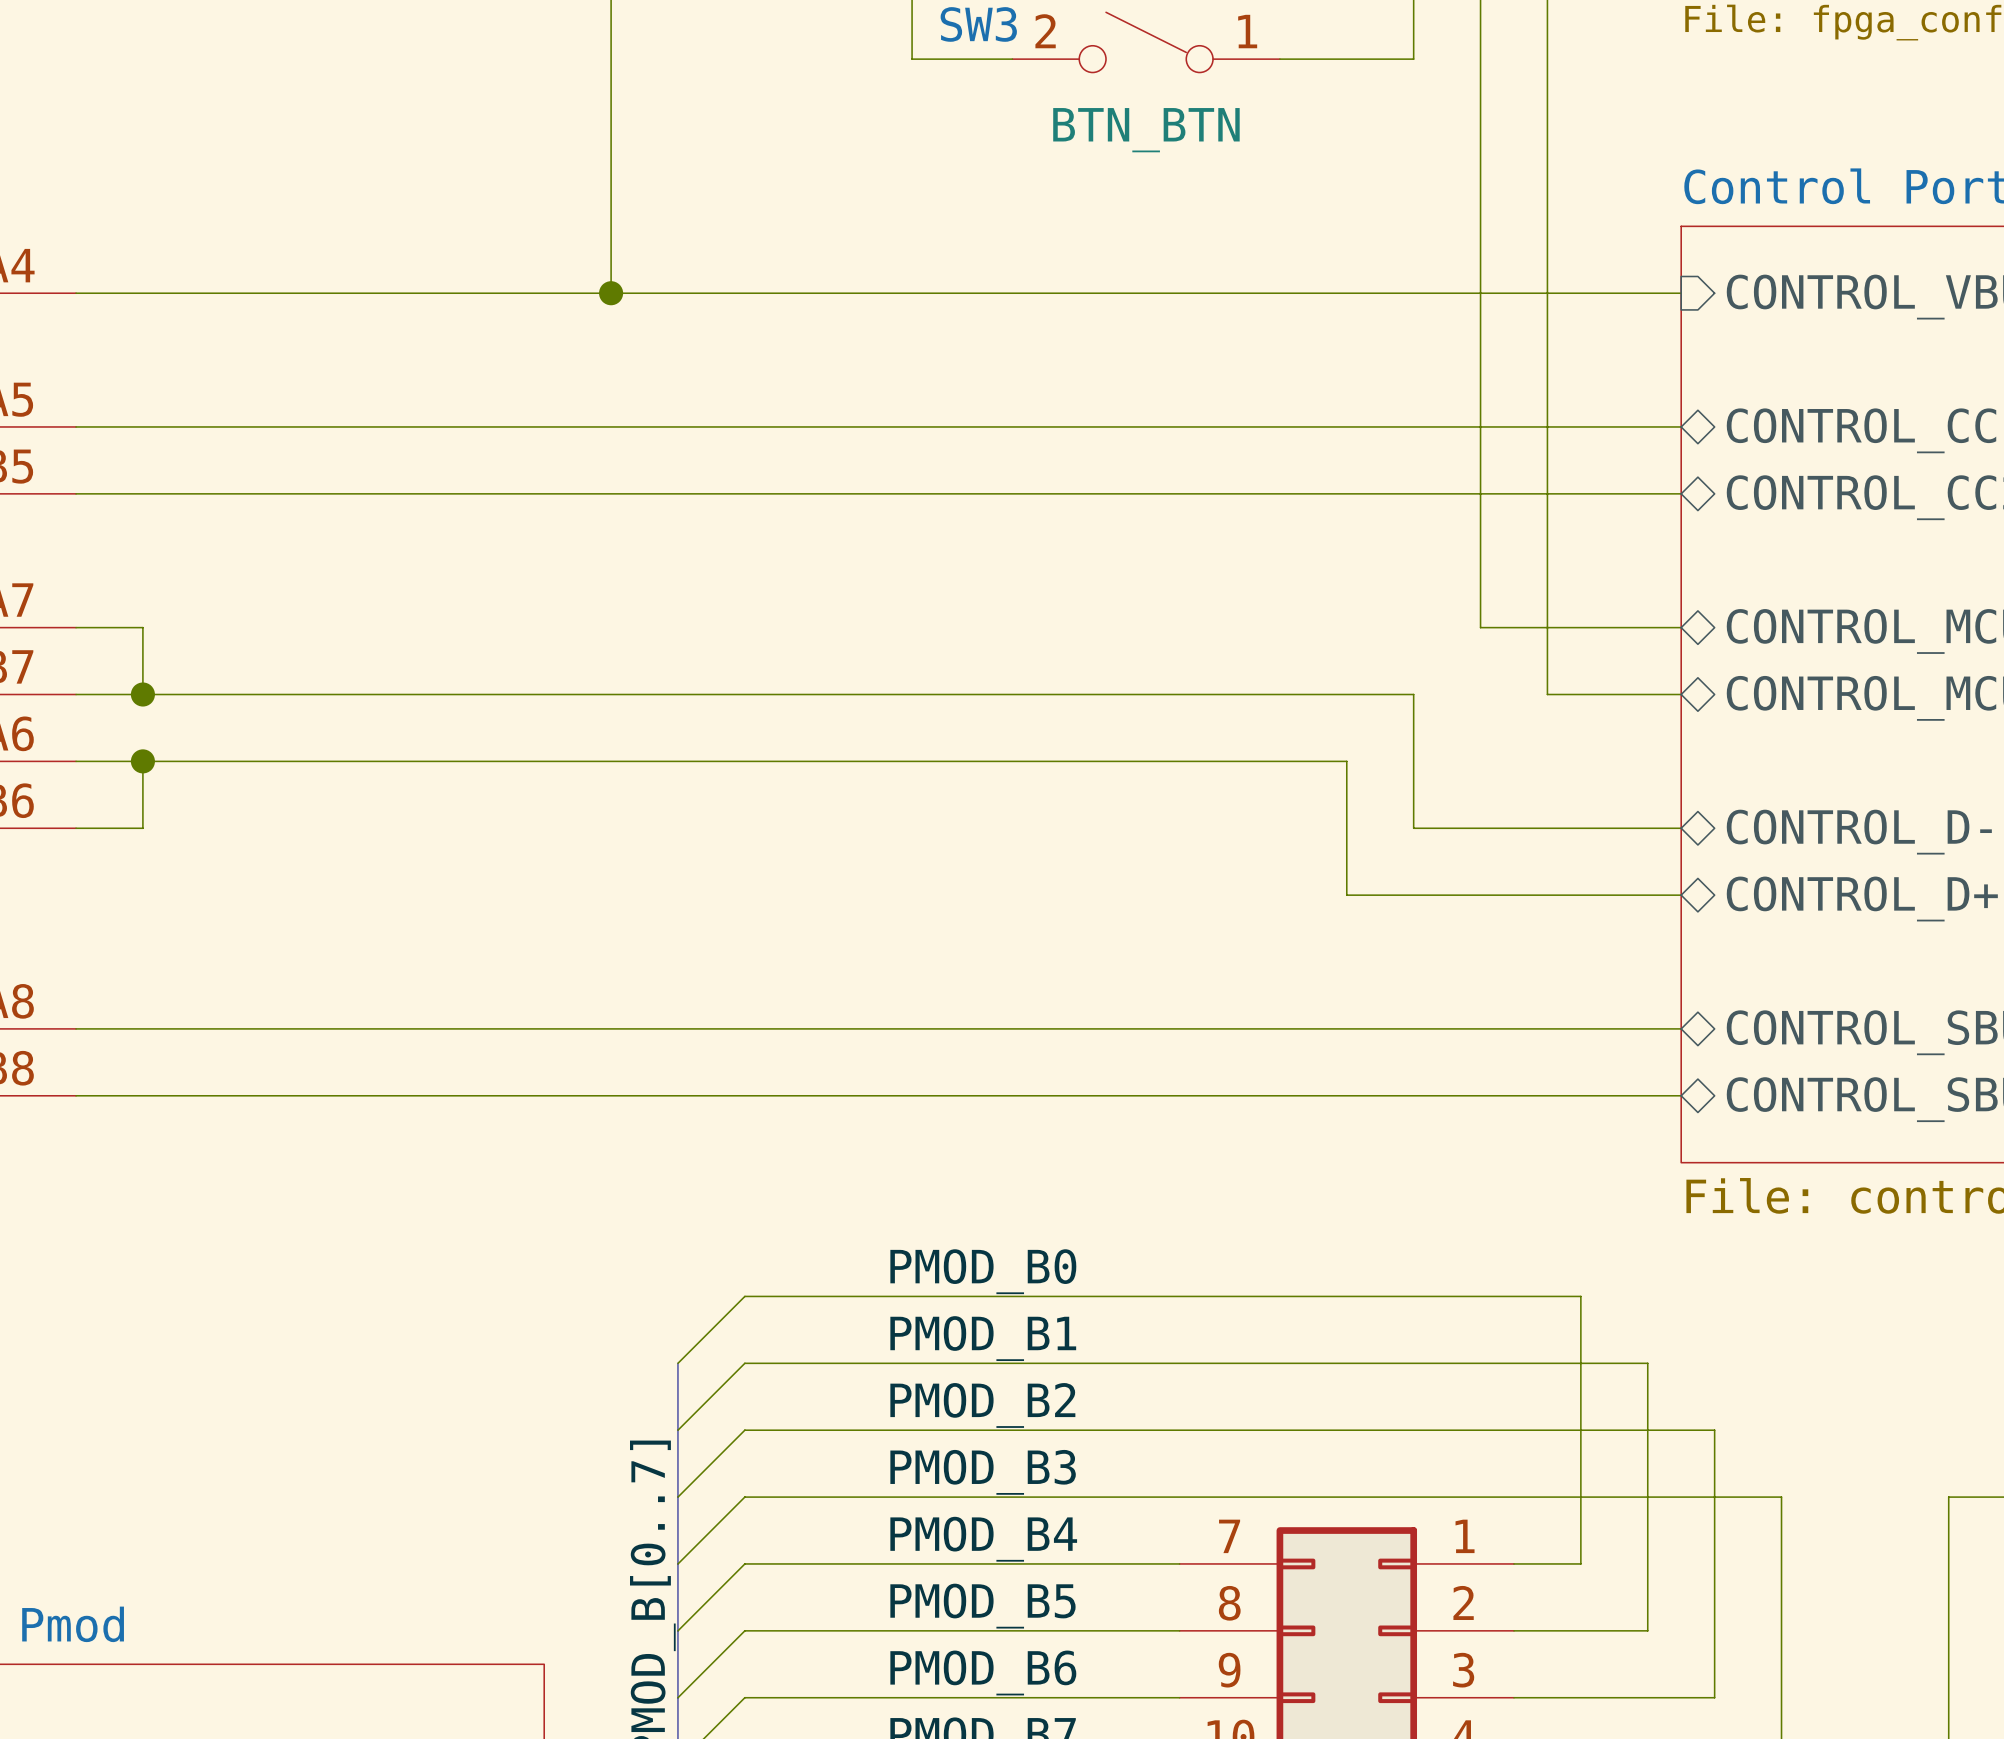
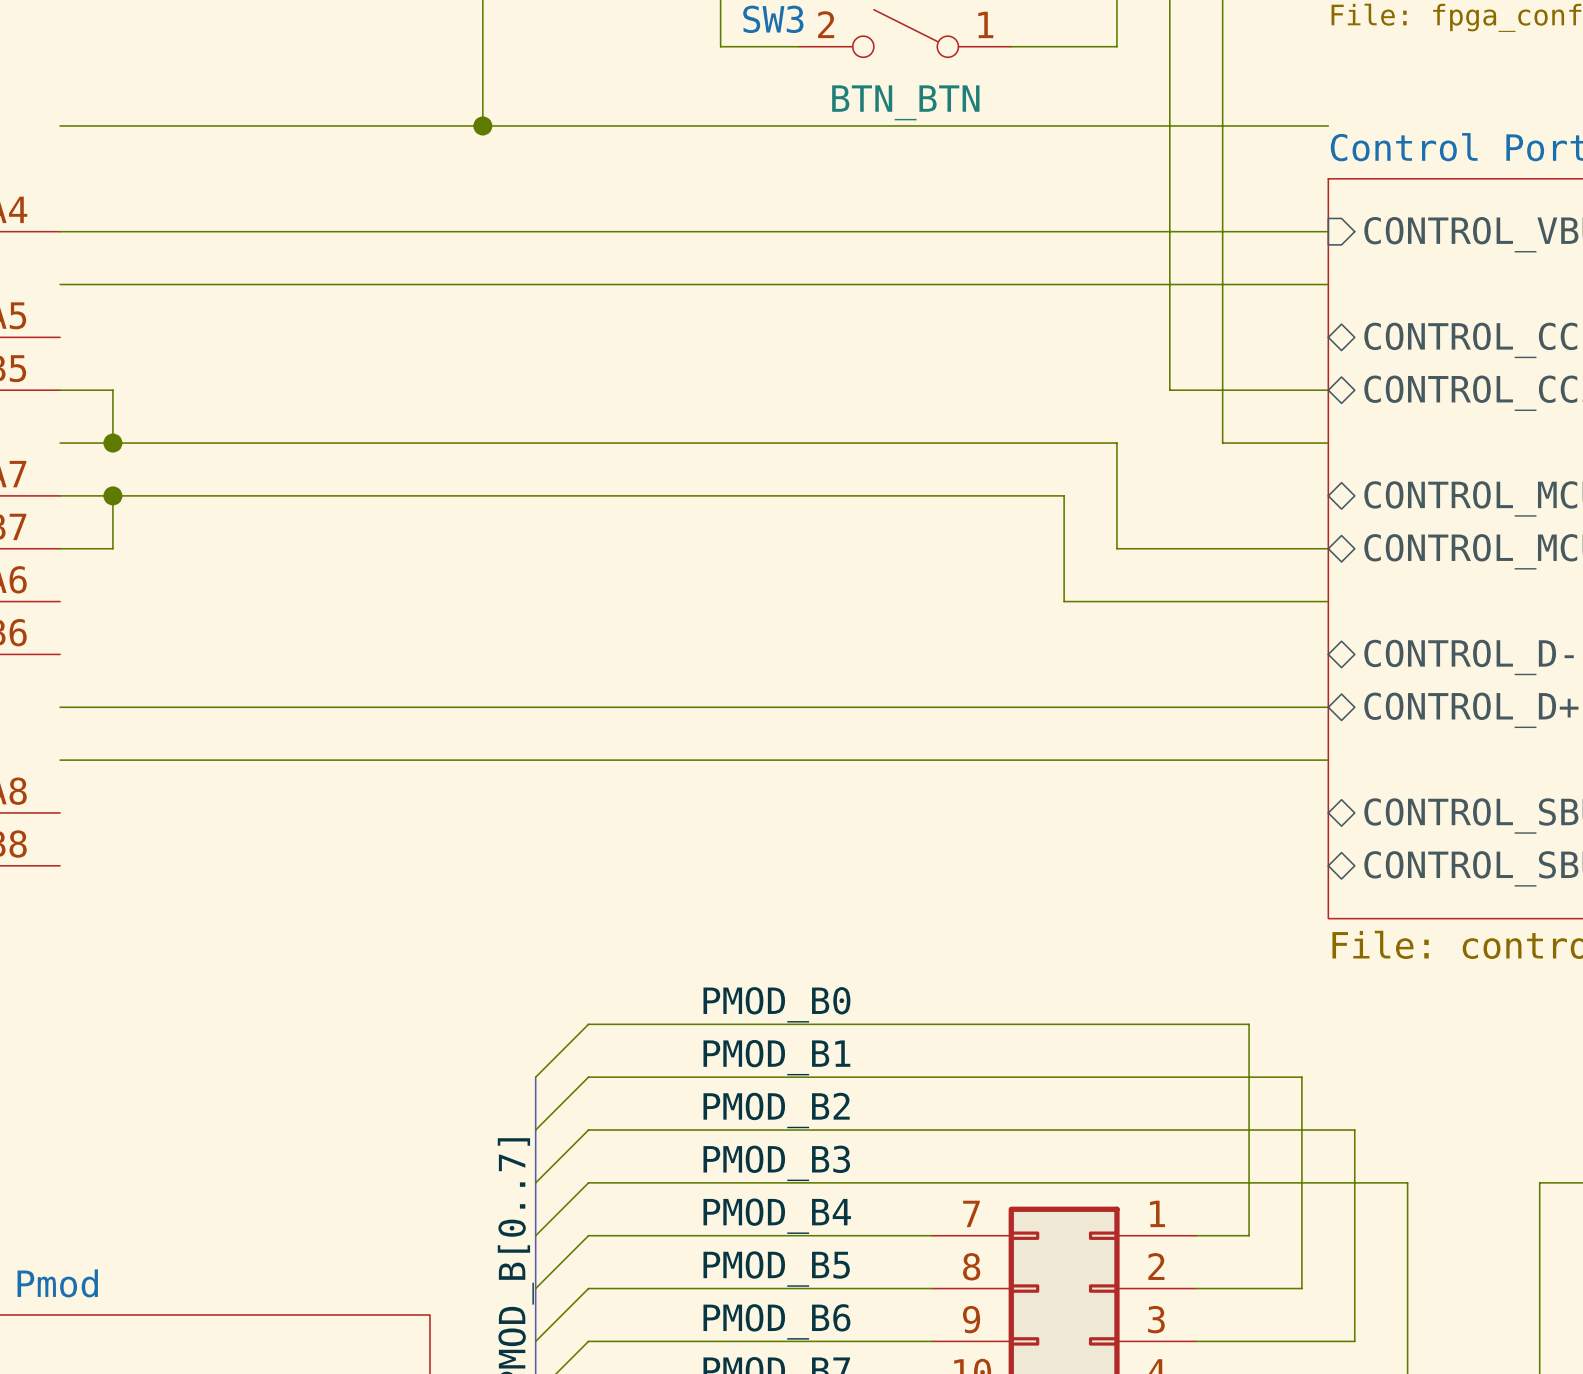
wire: none -> (60, 125) (1328, 125)
wire: (611, 159) (611, 293) -> none
junction position: (611, 293) -> (482, 125)
wire: (76, 426) (1681, 426) -> (60, 284) (1328, 284)
wire: (142, 493) (1480, 493) (1480, 627) (1681, 627) -> (112, 390) (112, 443)
wire: none -> (60, 443) (1116, 443) (1116, 548) (1222, 548)
junction: none -> (112, 443)
wire: (1547, 560) (1547, 694) -> (1222, 443) (1328, 443)
wire: none -> (112, 495) (1064, 495) (1064, 601) (1328, 601)
junction: none -> (112, 495)
wire: (142, 694) (1413, 694) (1413, 828) (1681, 828) -> none
junction: (142, 694) -> none
wire: (76, 761) (1346, 761) (1346, 895) -> (60, 707) (1064, 707)
wire: (142, 761) (142, 828) (76, 828) -> none
junction: (142, 761) -> none
wire: (76, 1028) (1681, 1028) -> none
wire: (76, 1095) (1681, 1095) -> (60, 760) (1328, 760)

